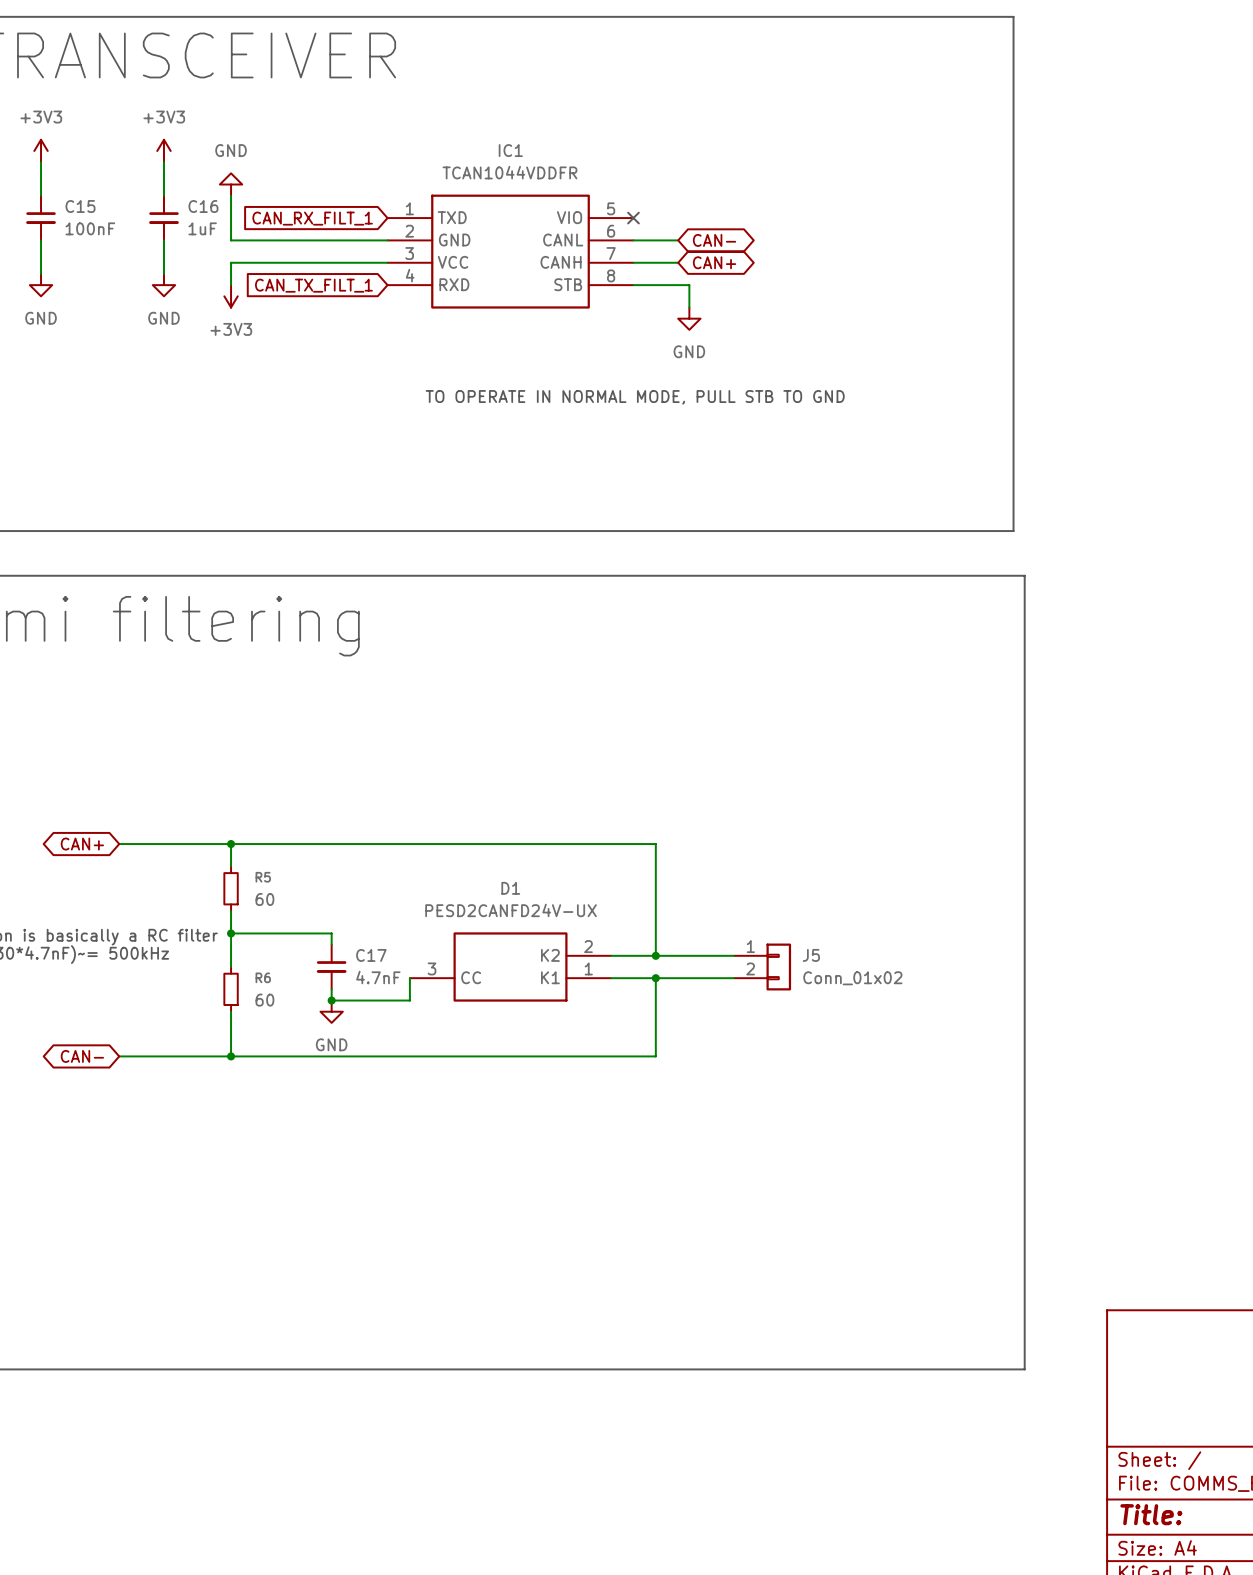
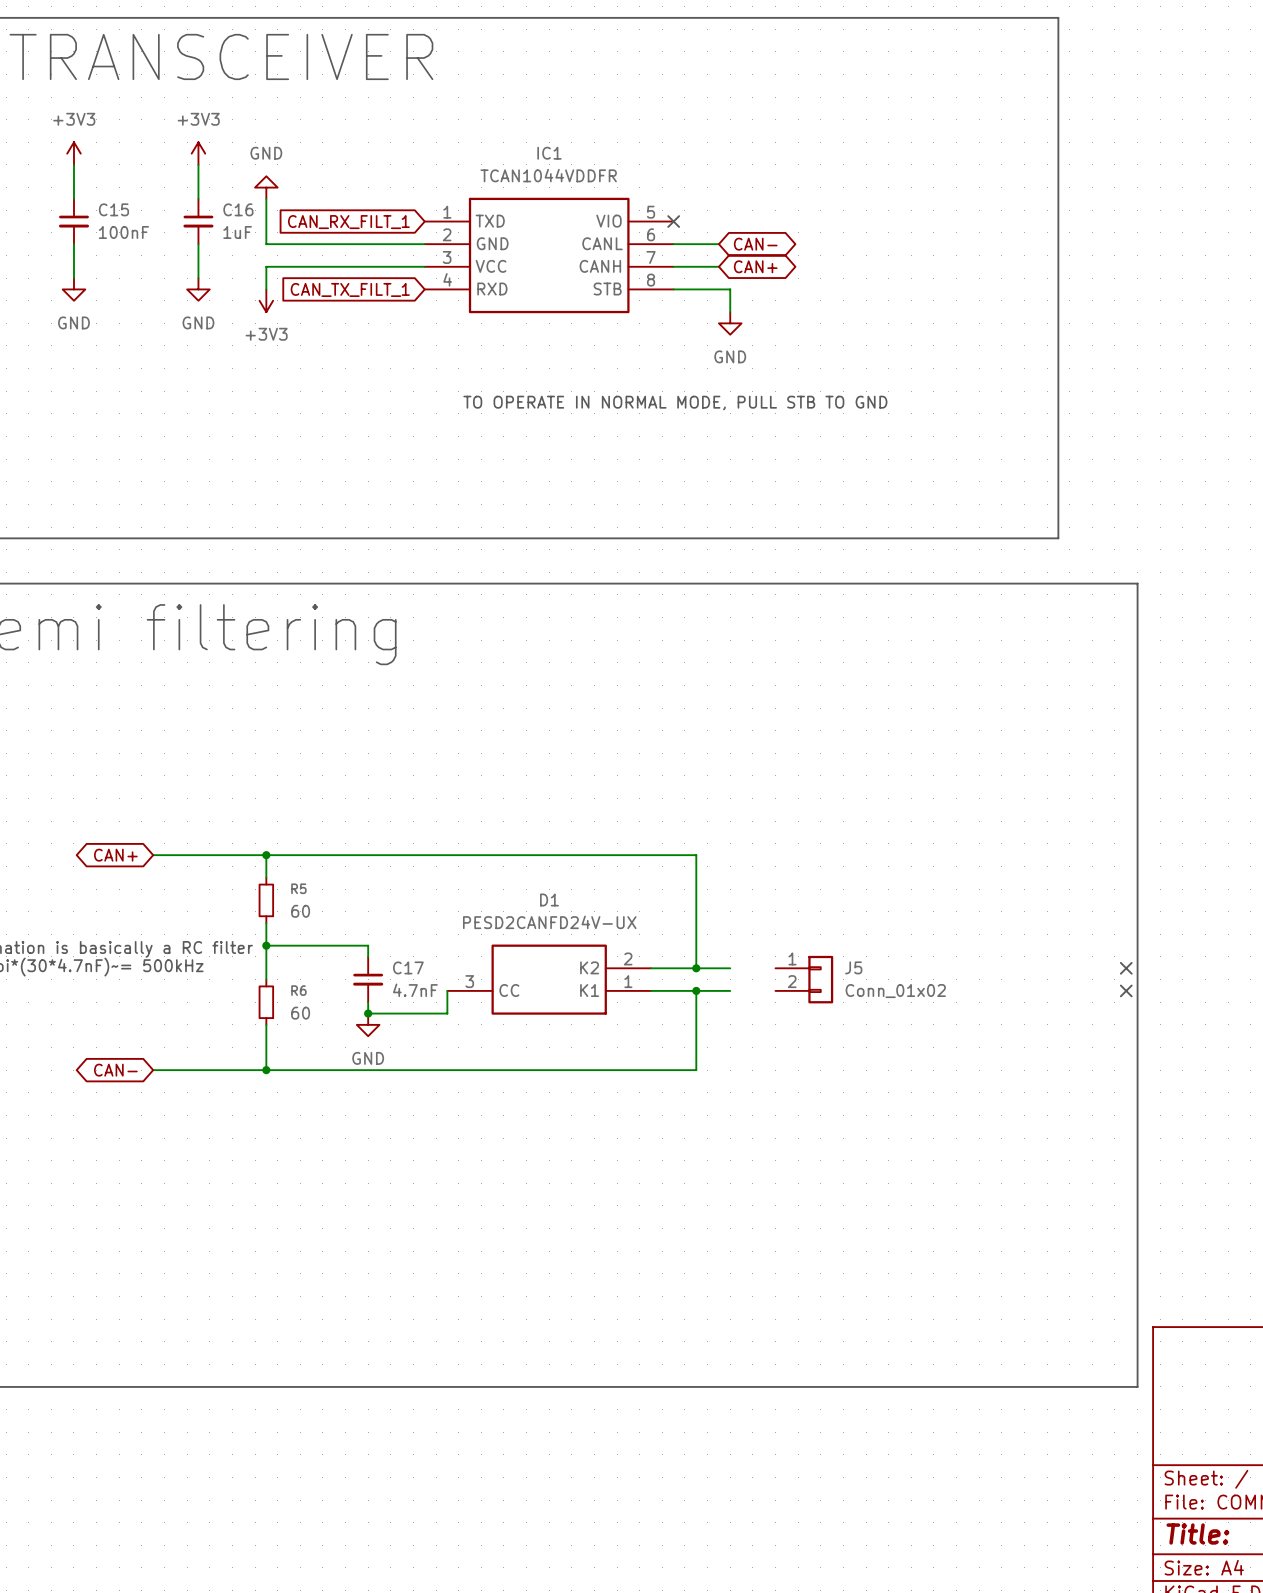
line: (1024, 575) (1024, 1369) -> (1069, 583) (1137, 583) (1137, 1386) (1069, 1386)
wire: (689, 955) (734, 955) -> none
no-connect mark: none -> (1126, 968)
wire: (689, 978) (734, 978) -> none
no-connect mark: none -> (1126, 990)

